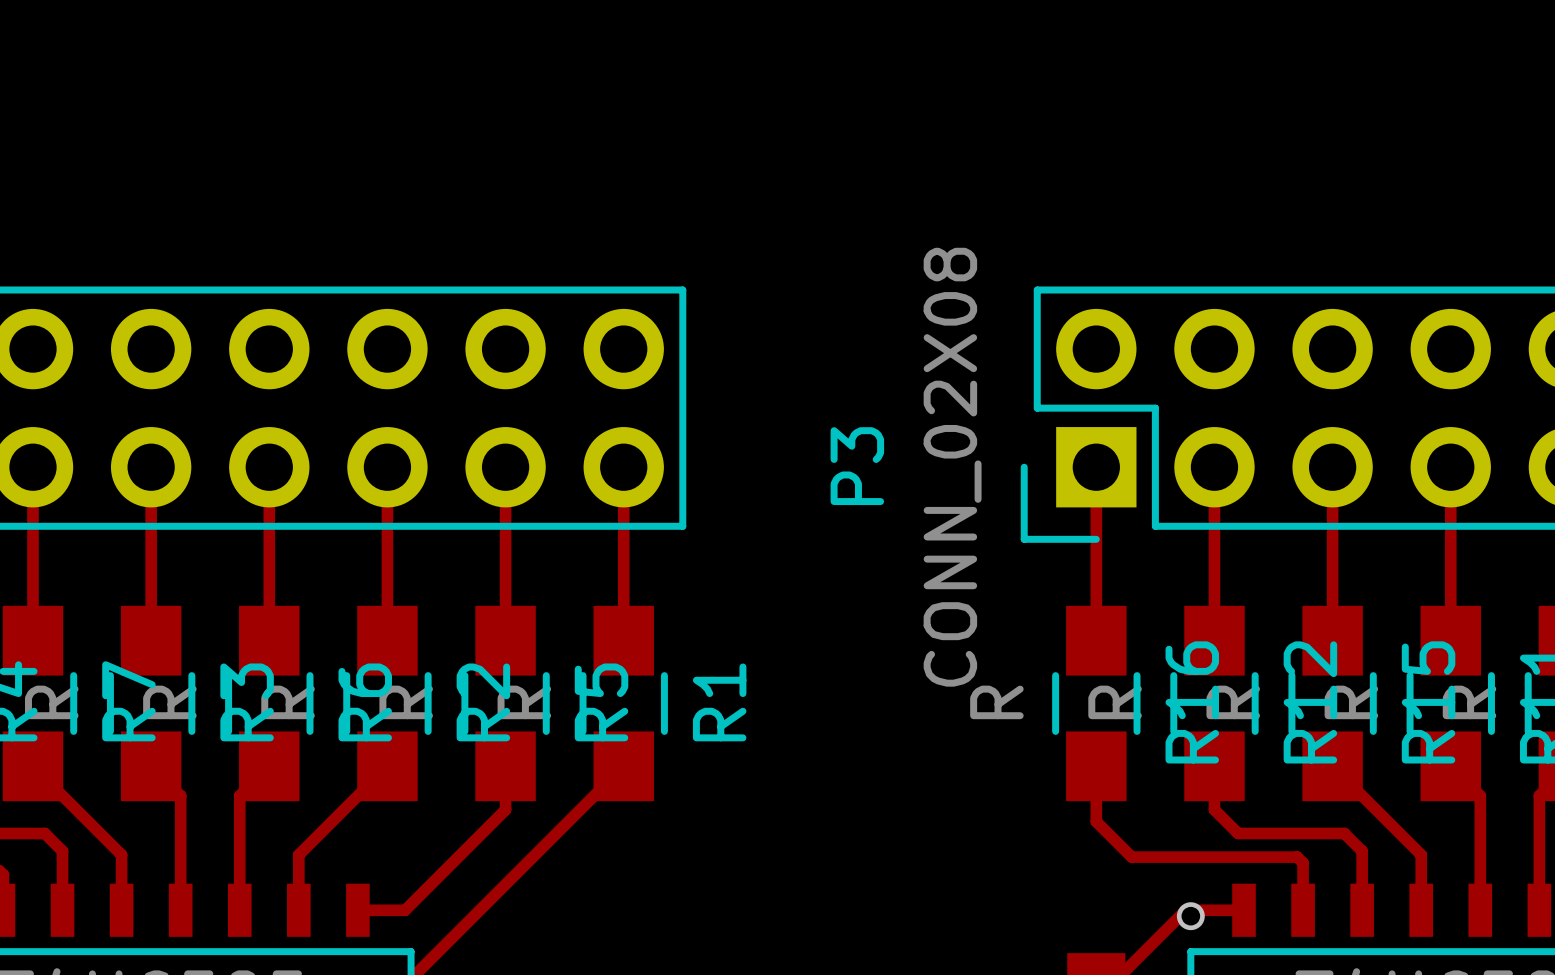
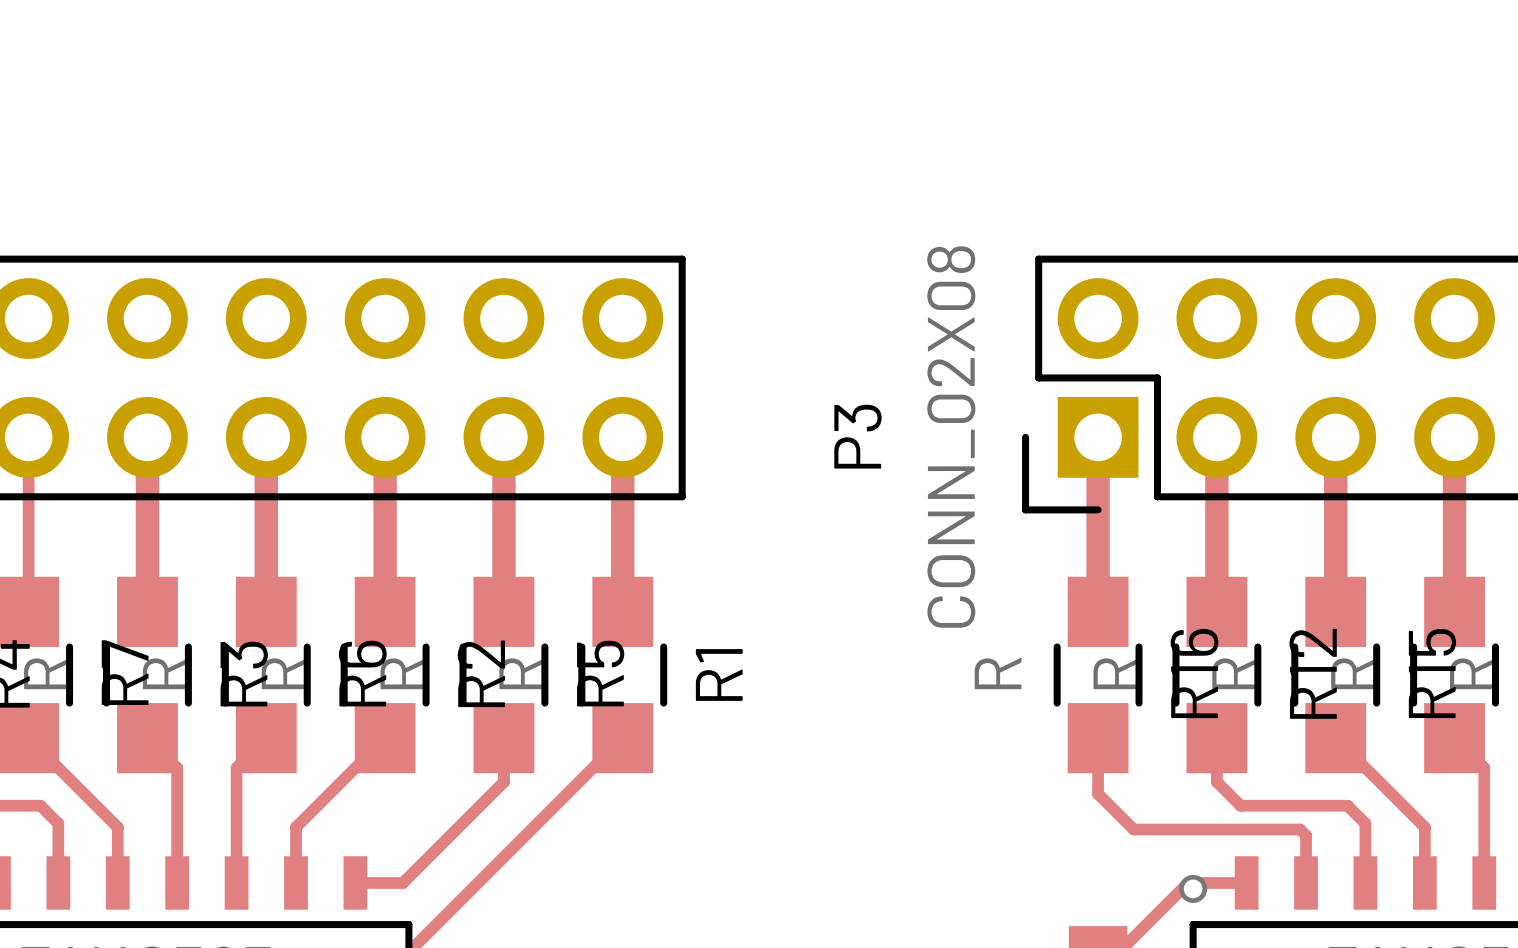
top track width: thin (151, 467) (151, 640) -> thick (147, 437) (147, 611)
top track width: thin (269, 467) (269, 640) -> thick (266, 437) (266, 611)
top track width: thin (387, 467) (387, 640) -> thick (385, 437) (385, 611)
top track width: thin (505, 467) (505, 640) -> thick (503, 437) (503, 611)
top track width: thin (623, 467) (623, 640) -> thick (622, 437) (622, 611)
top track width: thin (1096, 467) (1096, 640) -> thick (1098, 437) (1098, 611)
top track width: thin (1214, 467) (1214, 640) -> thick (1216, 437) (1216, 611)
top track width: thin (1332, 467) (1332, 640) -> thick (1335, 437) (1335, 611)
top track width: thin (1450, 467) (1450, 640) -> thick (1454, 437) (1454, 611)

